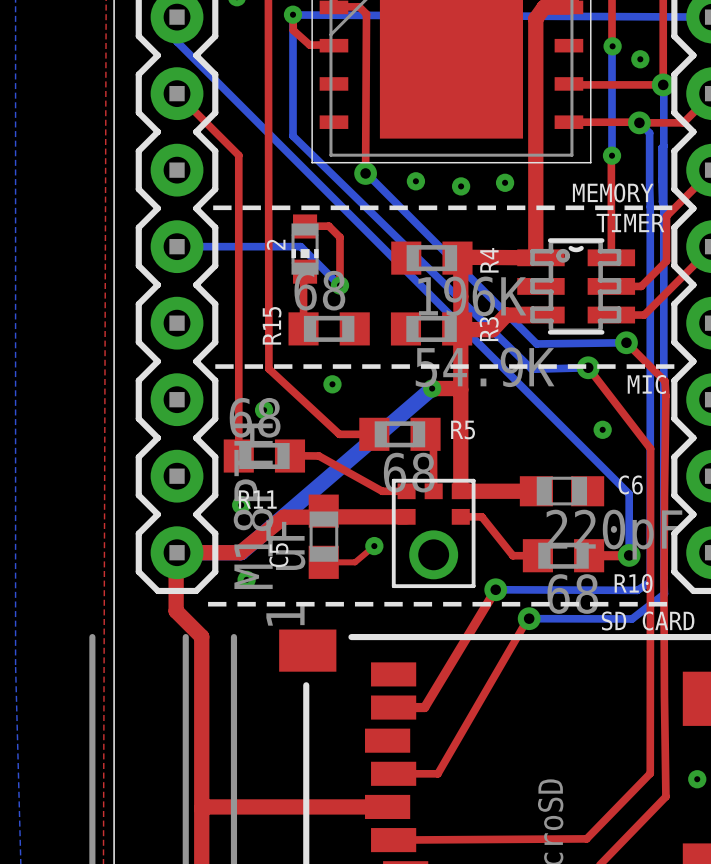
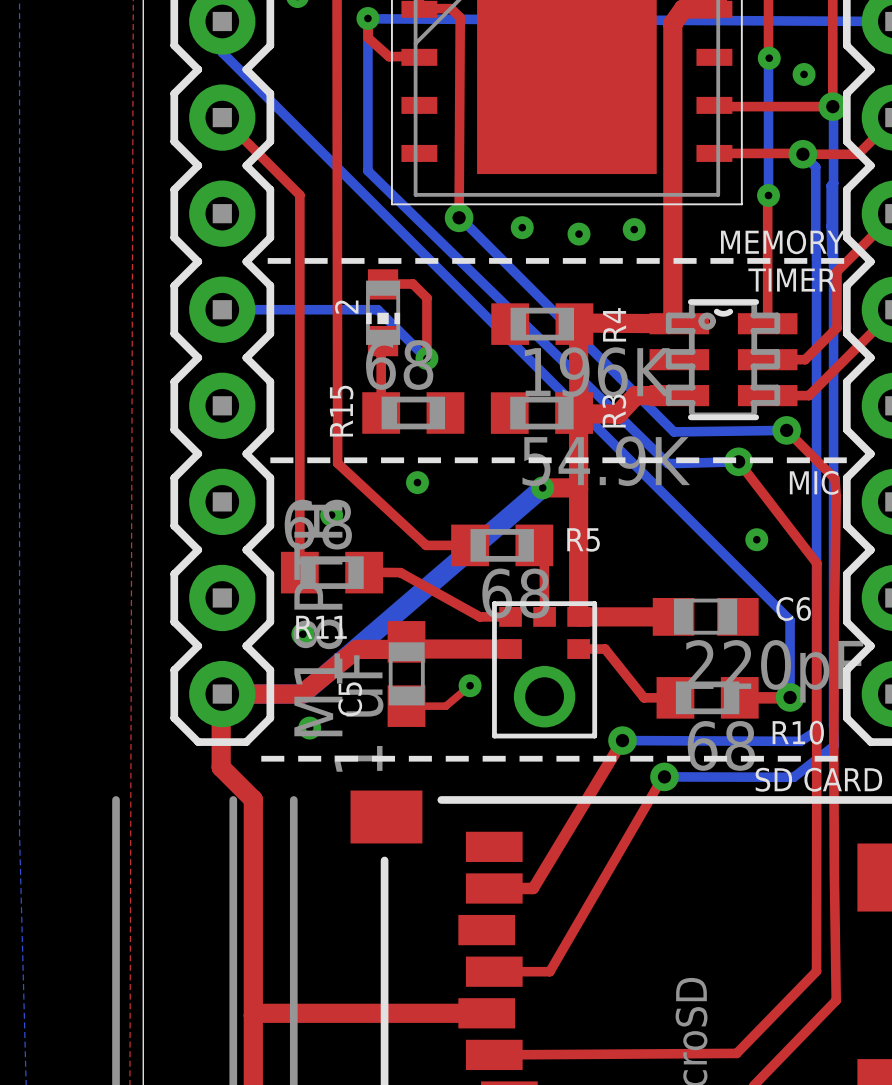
via: (697, 779) -> none

